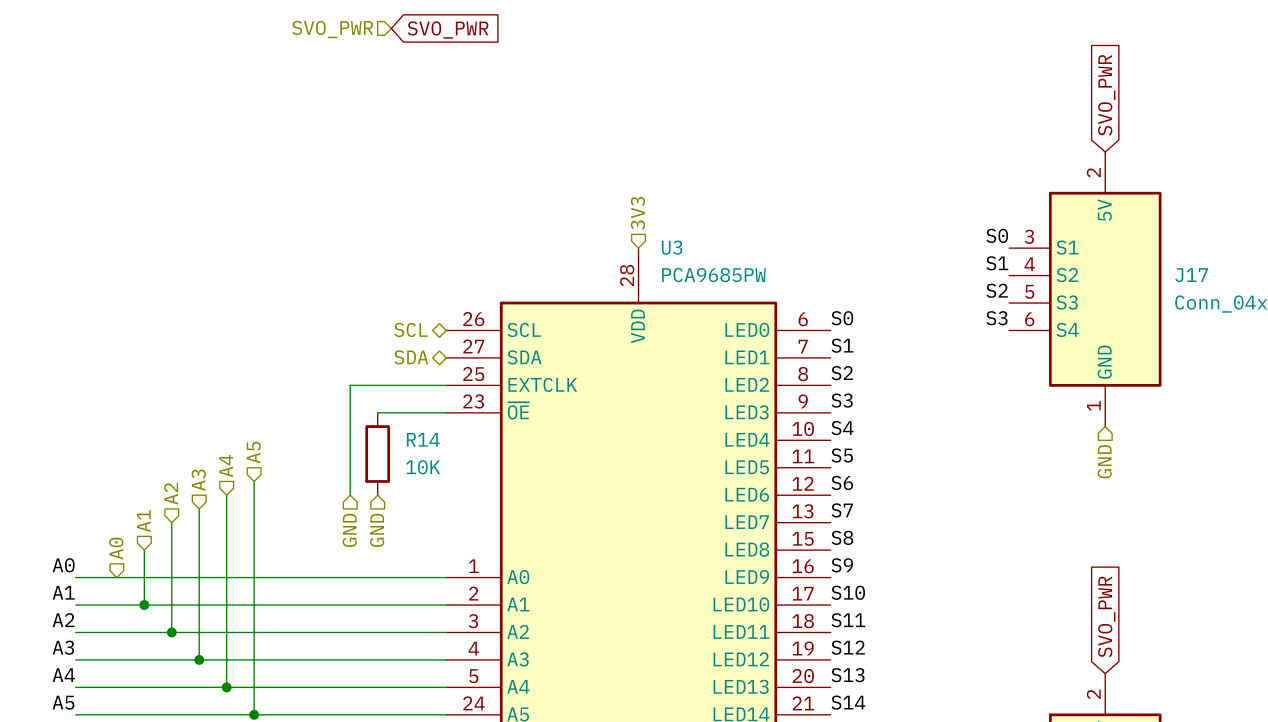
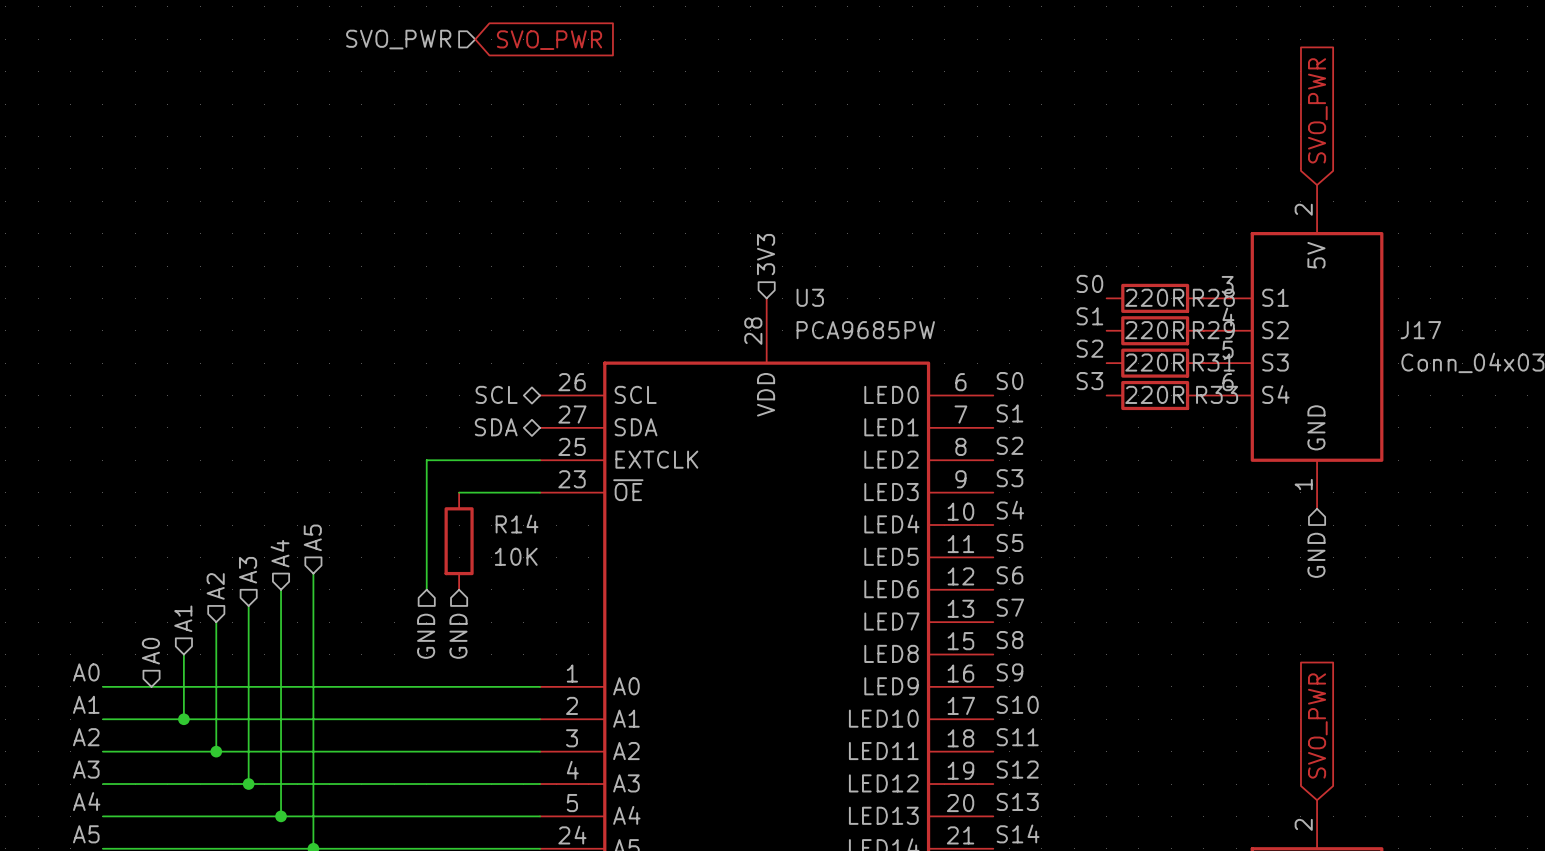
label position: S0 (997, 235) -> S0 (1089, 283)
R28: none -> 220R (1155, 298)
label position: S1 (997, 263) -> S1 (1089, 316)
R29: none -> 220R (1155, 330)
label position: S2 (997, 290) -> S2 (1089, 348)
R31: none -> 220R (1155, 363)
label position: S3 (996, 318) -> S3 (1089, 381)
R33: none -> 220R (1155, 395)

